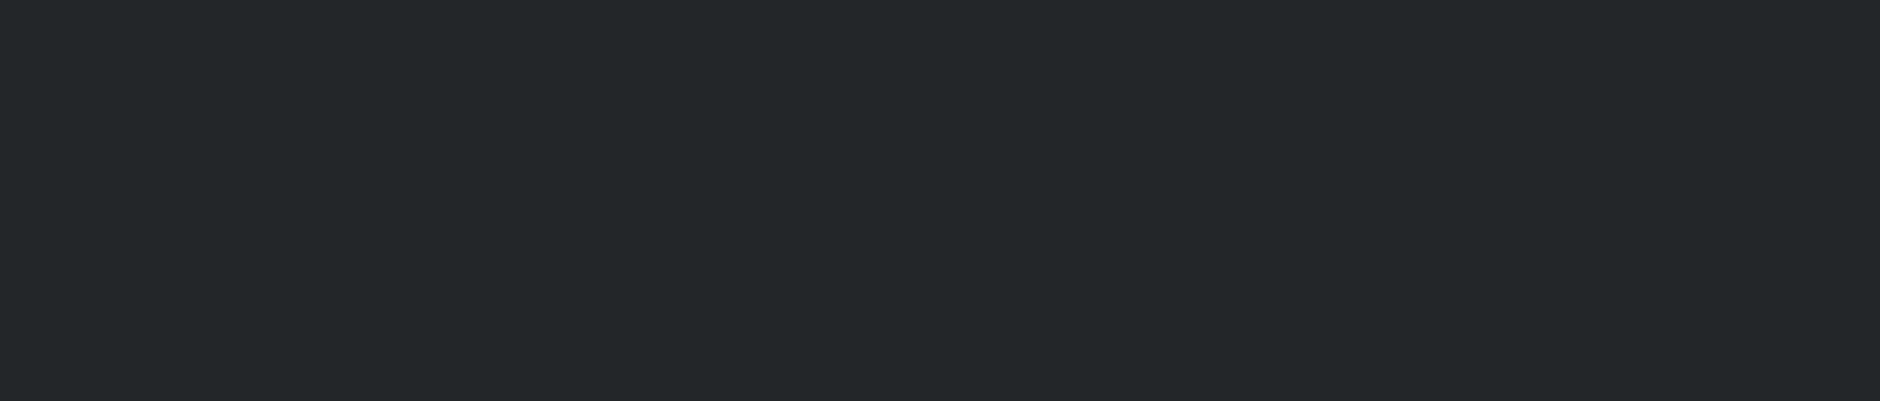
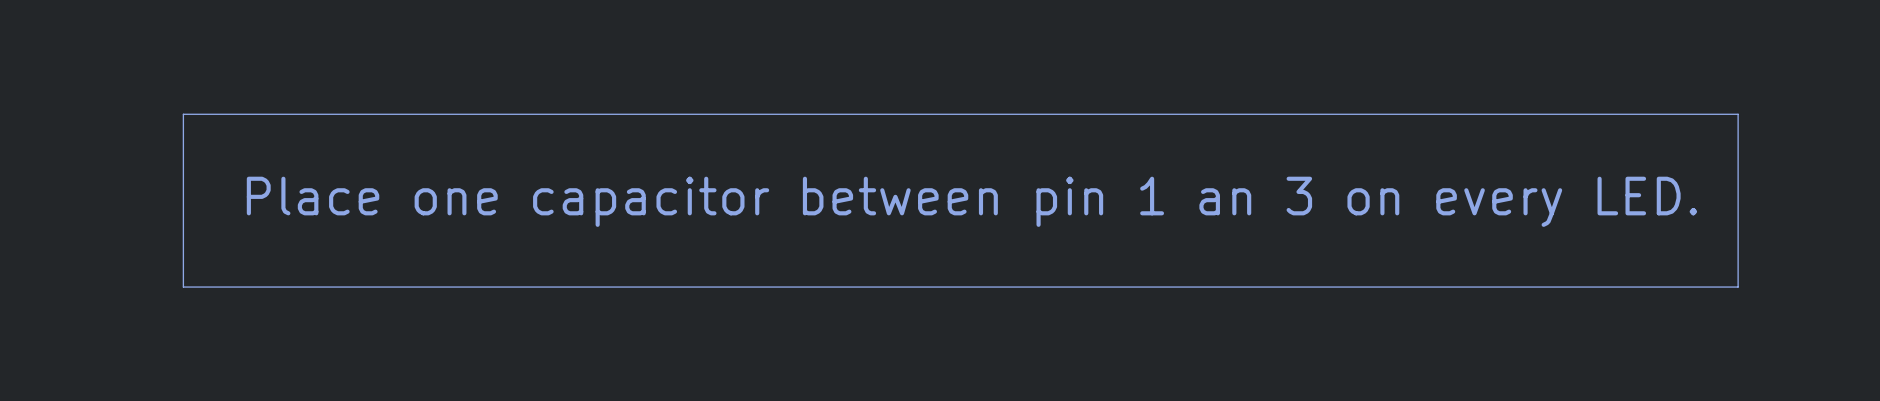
line: none -> (183, 114) (1738, 114) (1738, 287) (183, 287) (183, 114)
text: none -> Place one capacitor between pin 1 an 3 on every LED. (971, 201)

